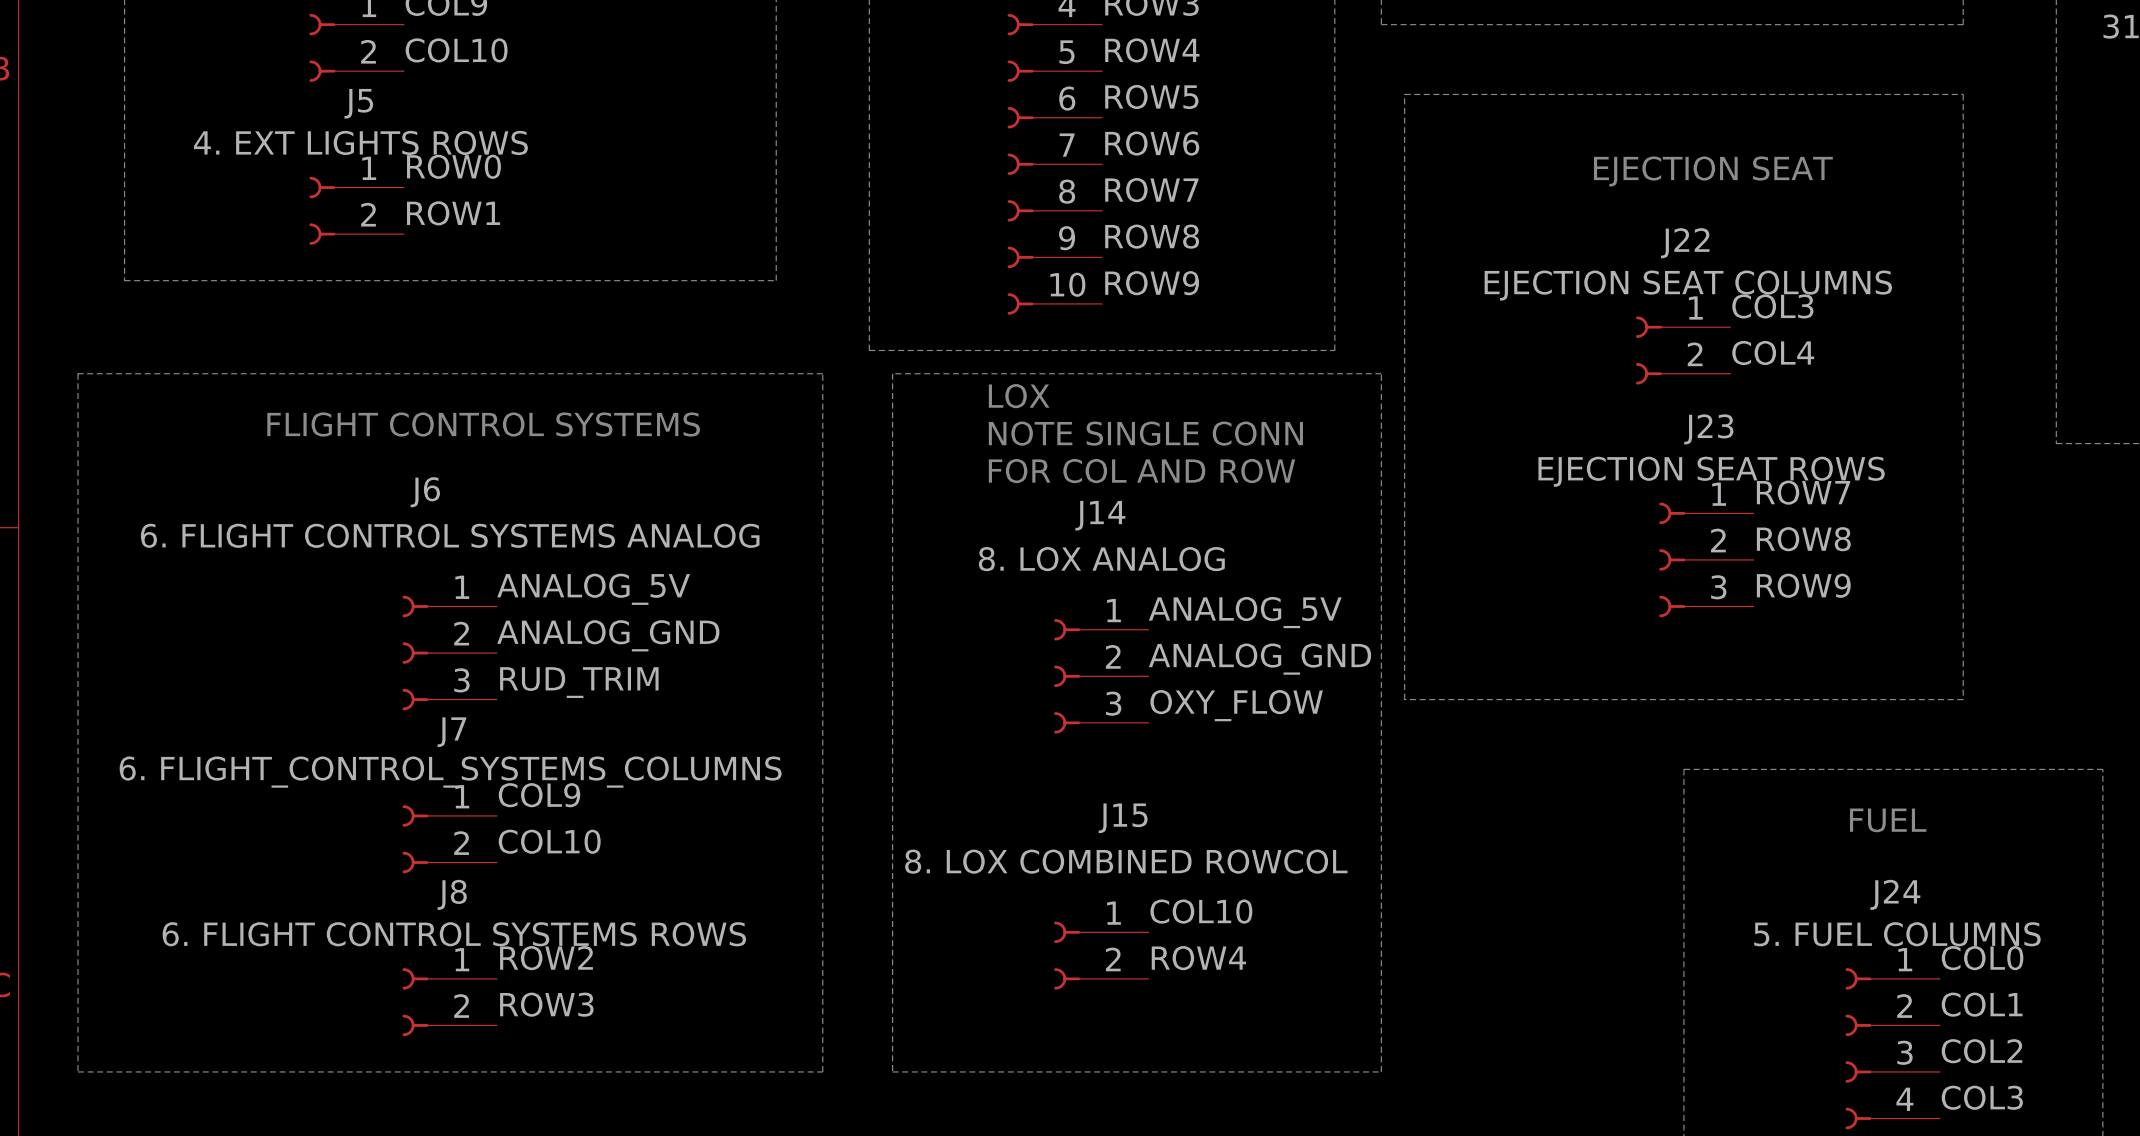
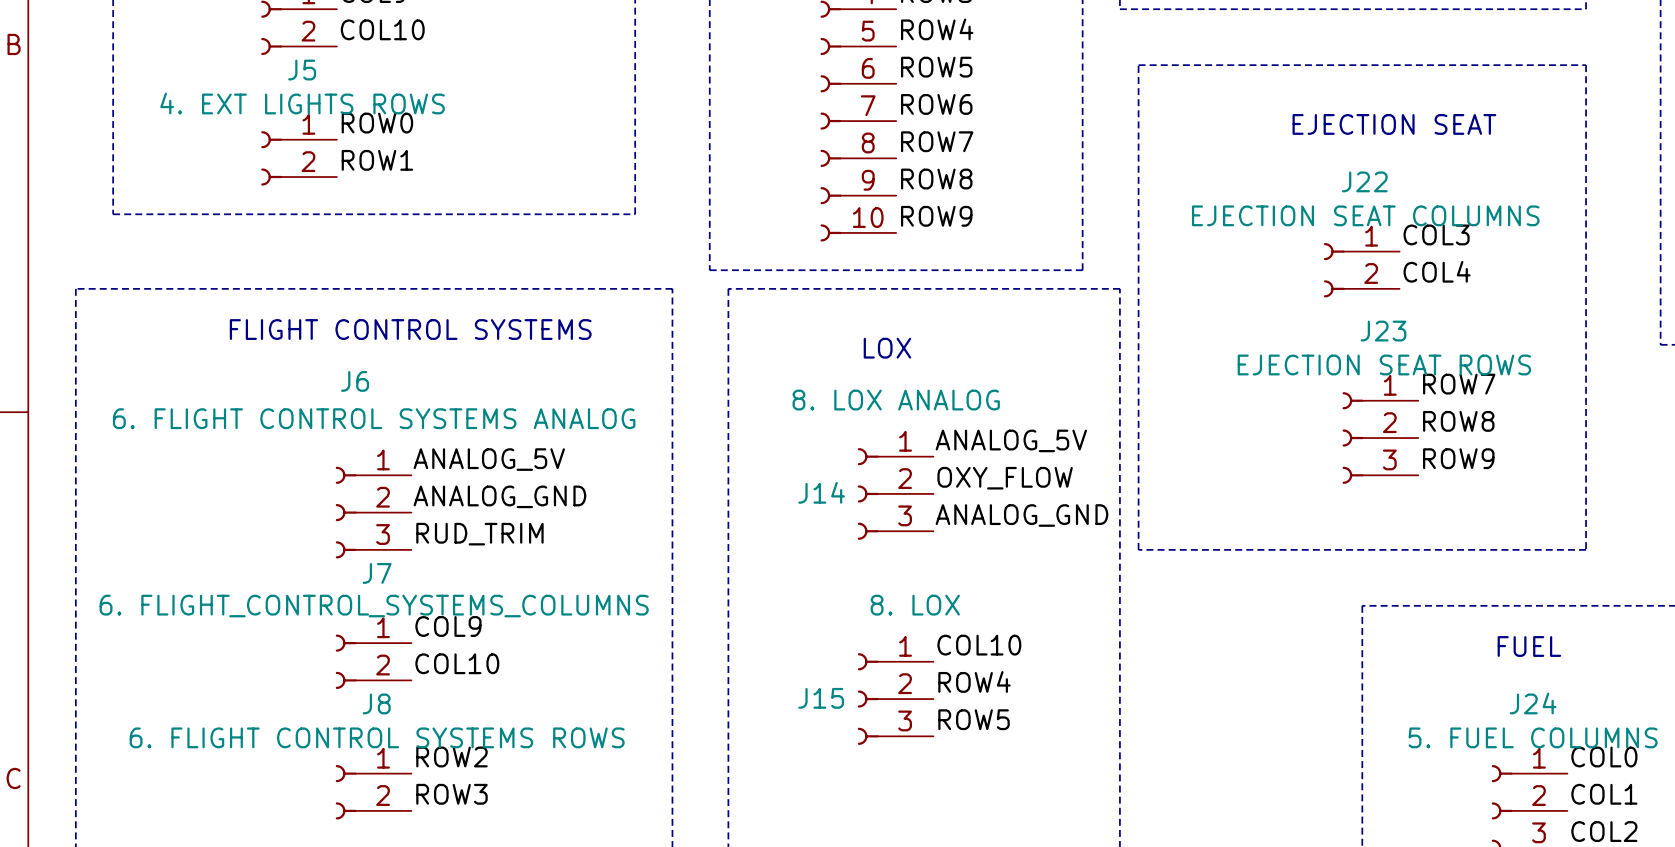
text position: LOX (1019, 396) -> LOX (887, 348)
text: NOTE SINGLE CONN (1145, 433) -> none
text: FOR COL AND ROW (1141, 471) -> none
J14 name position: J14 (1100, 515) -> J14 (821, 492)
label: none -> ANALOG_5V (1011, 440)
label: ANALOG_5V (1245, 612) -> OXY_FLOW (1005, 478)
J14 position: (1101, 676) -> (895, 493)
label: OXY_FLOW (1236, 705) -> none
J15 name position: J15 (1123, 818) -> J15 (821, 698)
label: none -> COL10 (979, 645)
J15 value: 8. LOX COMBINED ROWCOL (1126, 861) -> 8. LOX (915, 605)
label: COL10 (1201, 911) -> ROW5 (974, 719)
J15 symbol: [1054, 921, 1149, 990] -> [857, 653, 934, 745]
label position: ROW4 (1198, 958) -> ROW4 (974, 681)

